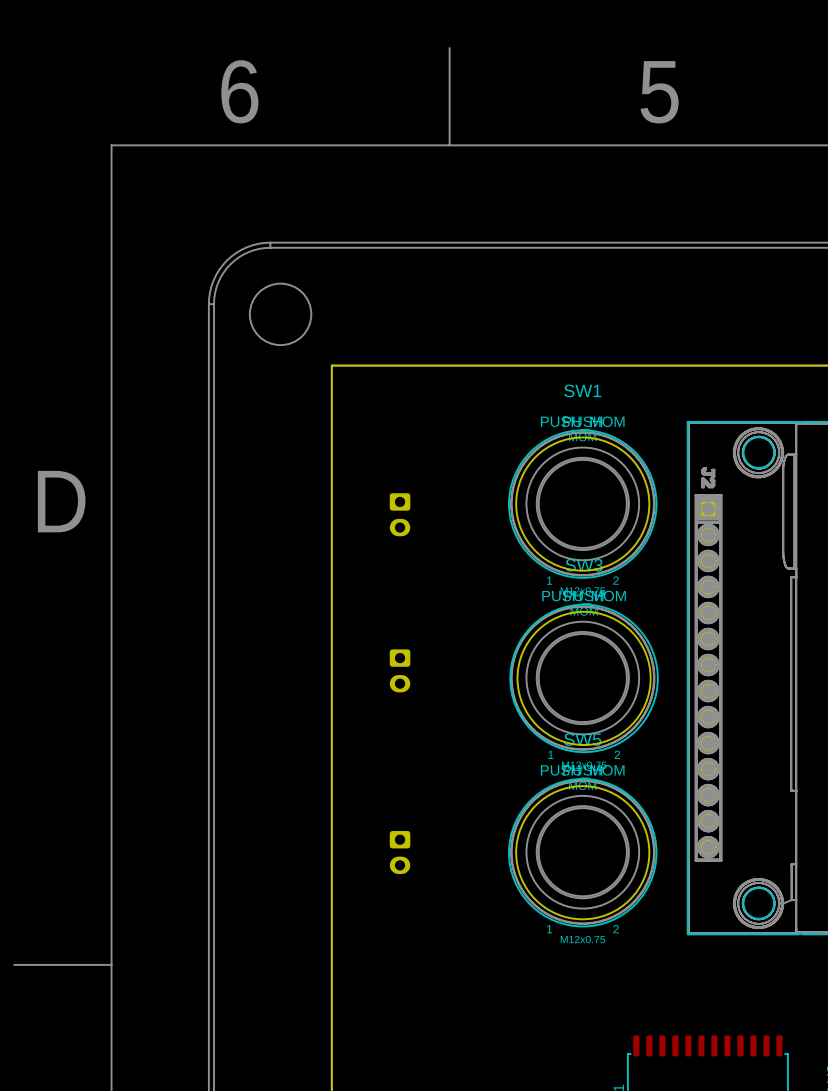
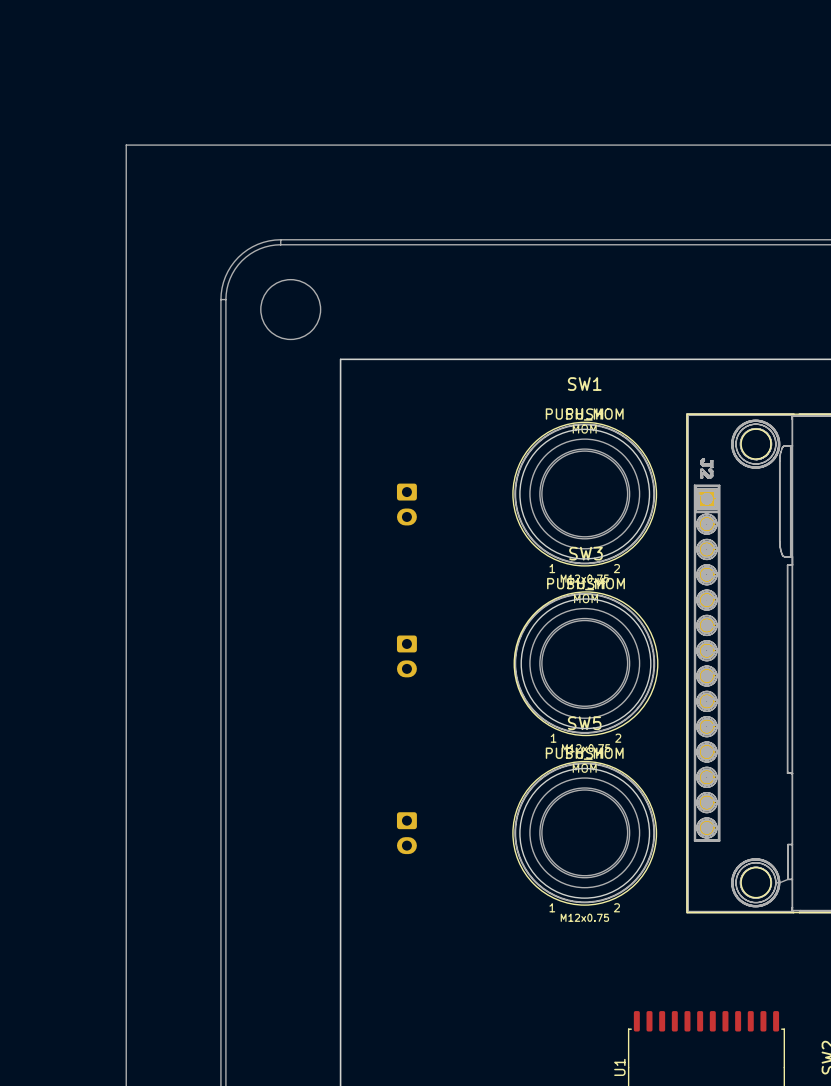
line: (449, 48) (449, 145) -> none
text: 6 (239, 91) -> none
text: 5 (659, 92) -> none
text: D (61, 501) -> none
line: (14, 964) (111, 964) -> none

